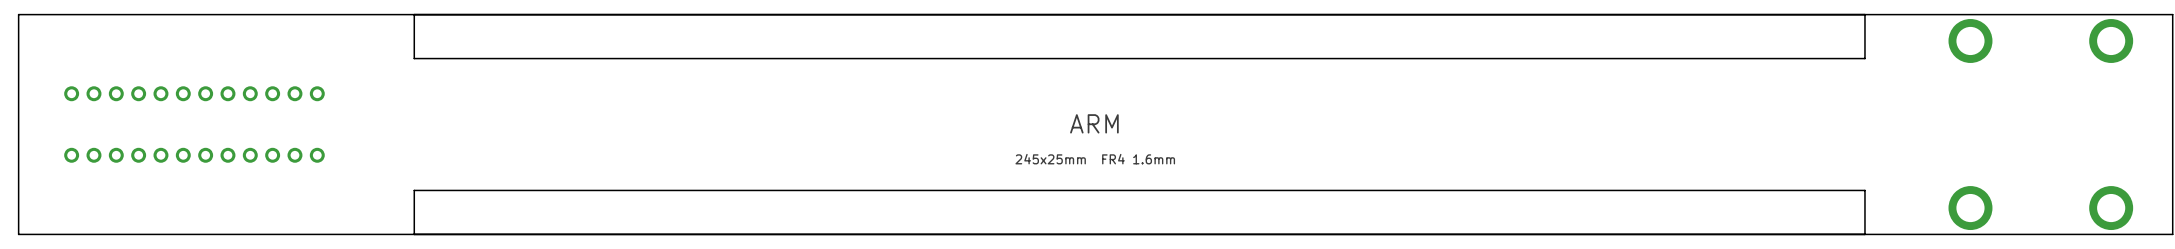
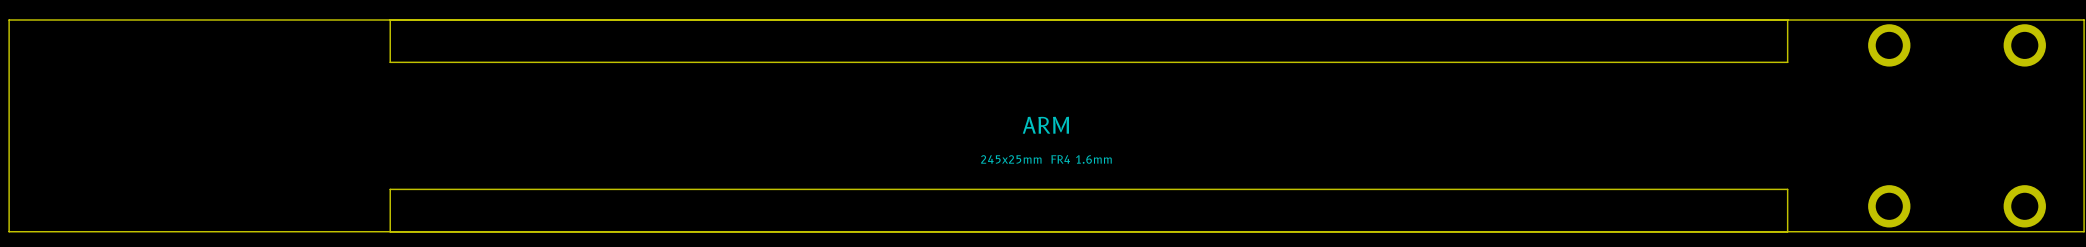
part: (71, 93) -> none
part: (93, 93) -> none
part: (116, 93) -> none
part: (138, 93) -> none
part: (160, 93) -> none
part: (183, 93) -> none
part: (205, 93) -> none
part: (227, 93) -> none
part: (250, 93) -> none
part: (272, 93) -> none
part: (294, 93) -> none
part: (317, 93) -> none
part: (71, 155) -> none
part: (93, 155) -> none
part: (116, 155) -> none
part: (138, 155) -> none
part: (160, 155) -> none
part: (183, 155) -> none
part: (205, 155) -> none
part: (227, 155) -> none
part: (250, 155) -> none
part: (272, 155) -> none
part: (294, 155) -> none
part: (317, 155) -> none

